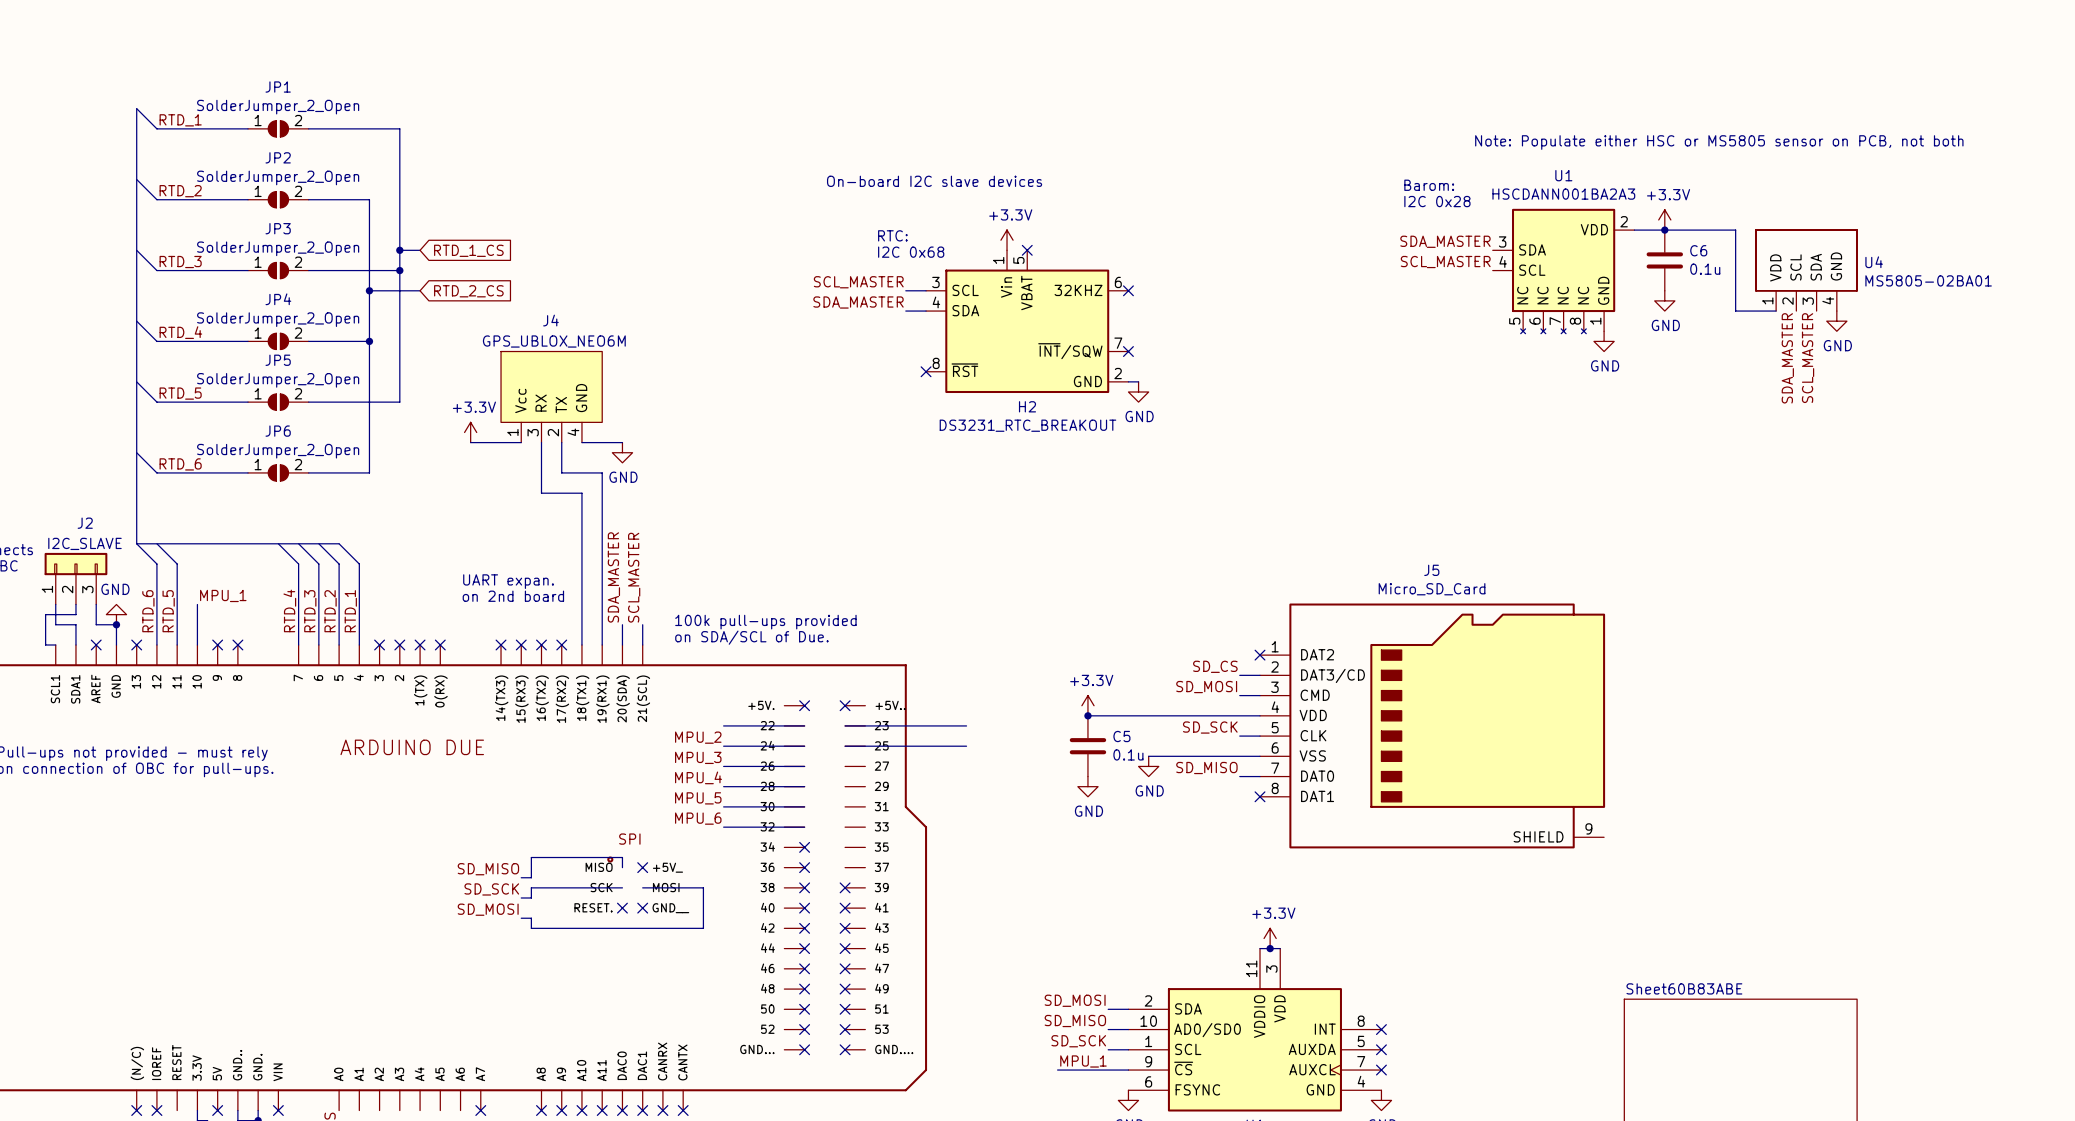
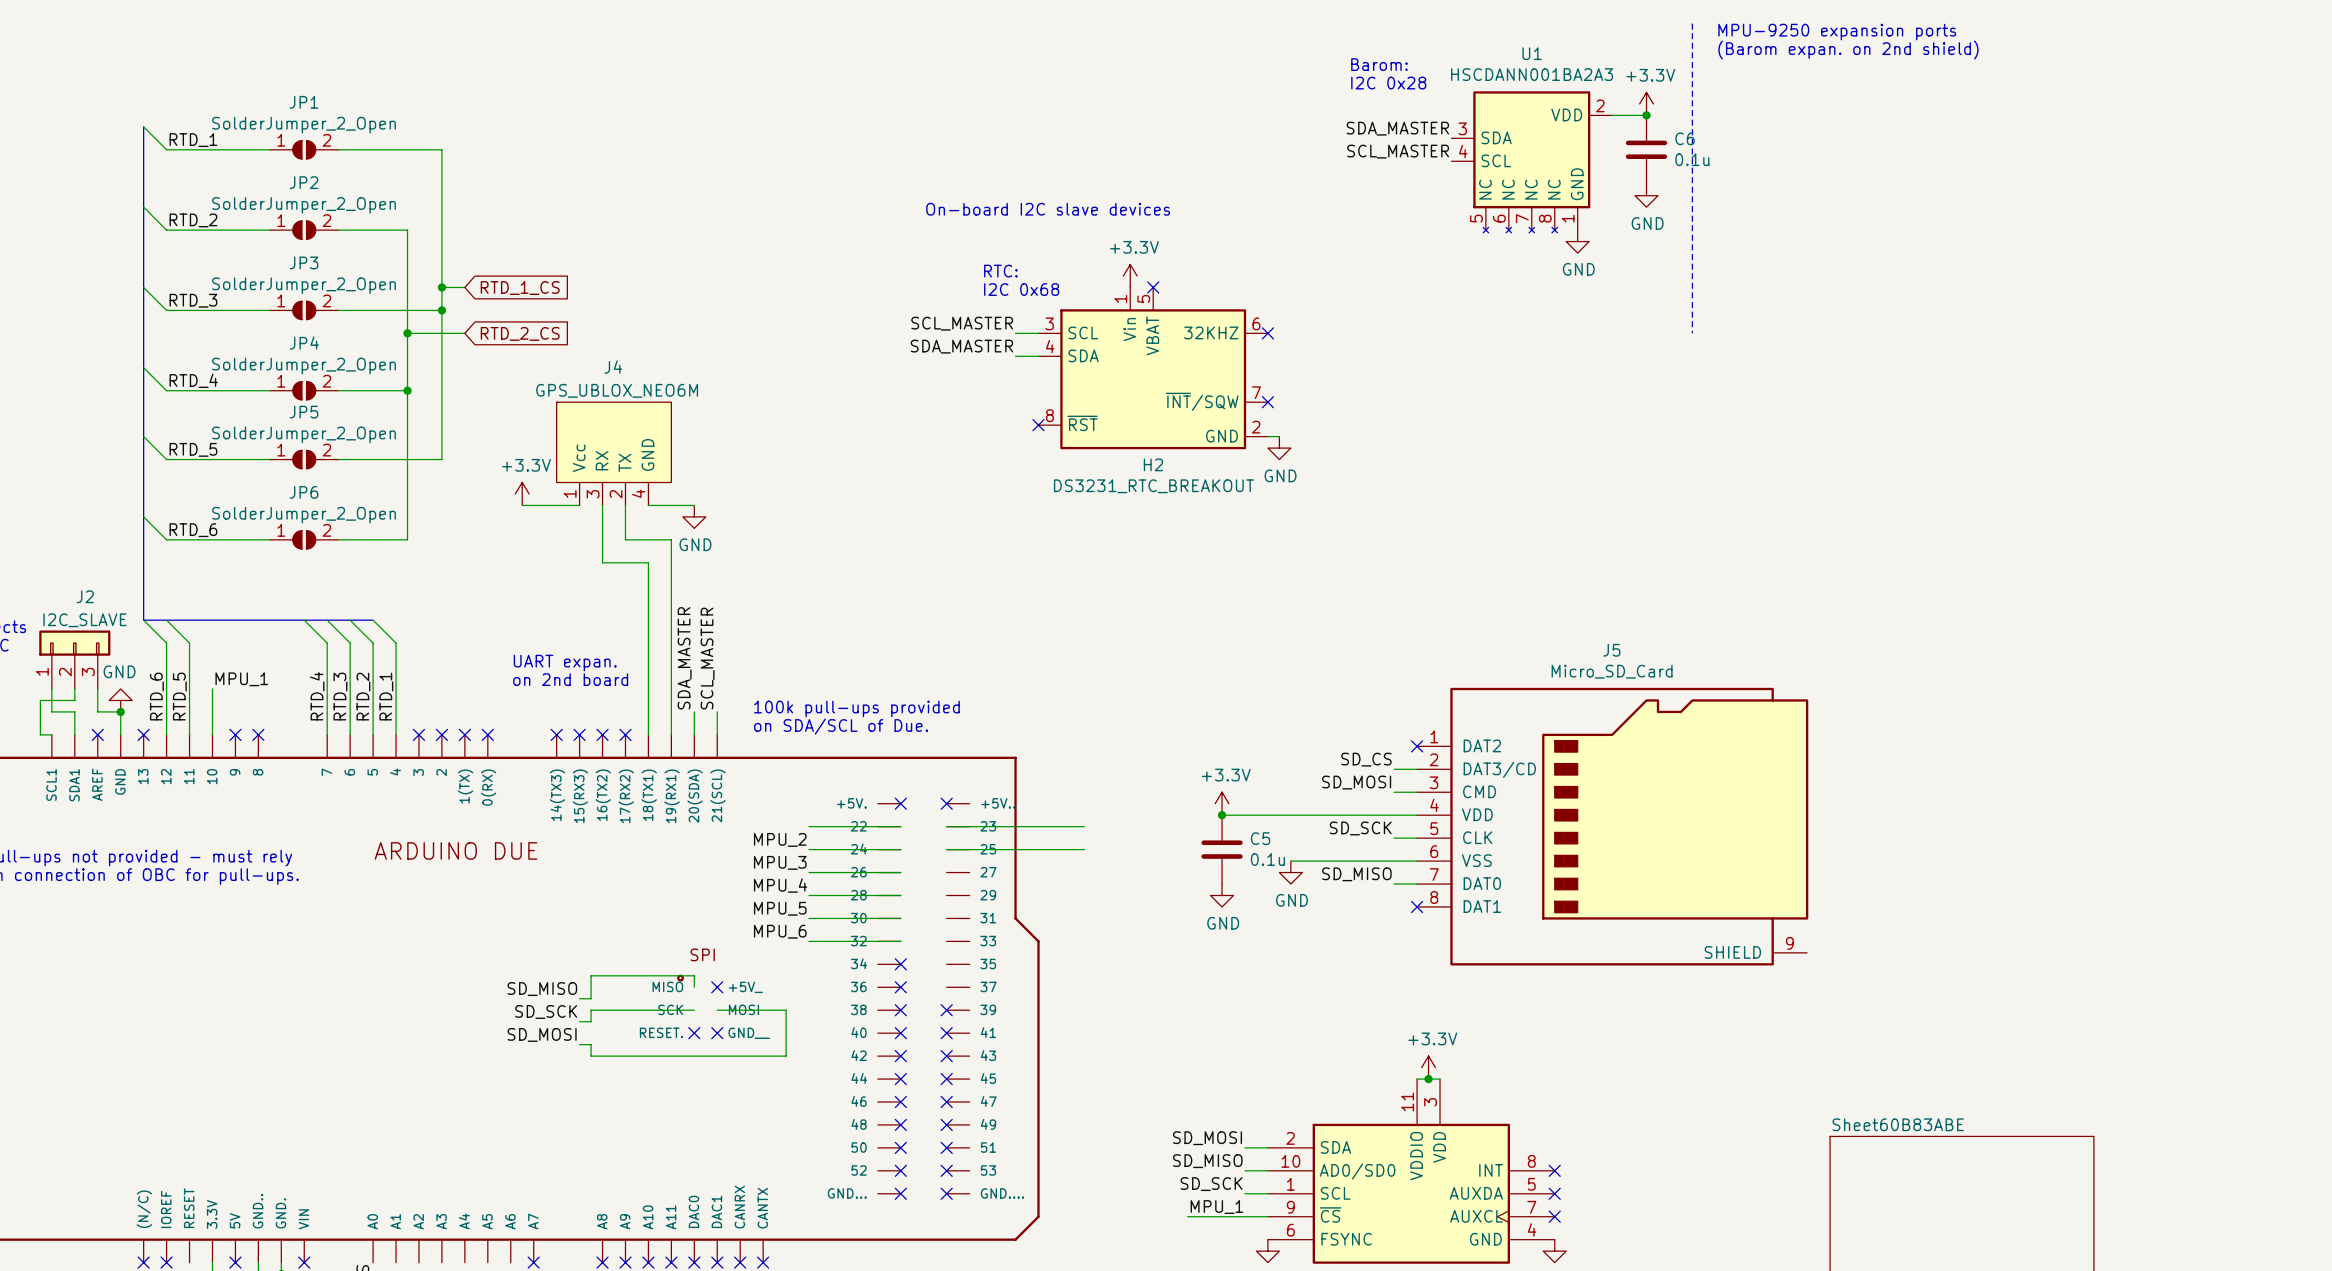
line: none -> (1692, 23) (1692, 333)
text: none -> MPU-9250 expansion ports (1837, 32)
text: none -> (Barom expan. on 2nd shield) (1848, 50)
text: none -> Barom: (1379, 64)
text: none -> I2C 0x28 (1388, 83)
power symbol: none -> +3.3V (1646, 103)
wire: none -> (1612, 115) (1646, 115)
junction: none -> (1646, 115)
label: none -> SDA_MASTER (1397, 128)
label: none -> SCL_MASTER (1398, 151)
text: Note: Populate either HSC or MS5805 sensor on PCB, not both (1719, 142) -> none
power symbol: none -> GND (1646, 195)
text: Barom: (1429, 185) -> none
text: I2C 0x28 (1437, 201) -> none
power symbol: none -> GND (1577, 241)
power symbol: +3.3V (1664, 219) -> none
wire: (1634, 230) (1735, 230) (1735, 311) (1776, 311) -> none
junction: (1664, 230) -> none
label: SDA_MASTER (1445, 241) -> none
C6 position: (1664, 260) -> (1646, 149)
label: SCL_MASTER (1445, 262) -> none
U4: MS5805-02BA01 (1806, 270) -> none
U1 position: (1563, 271) -> (1531, 162)
power symbol: GND (1664, 300) -> none
power symbol: GND (1836, 321) -> none
power symbol: GND (1604, 341) -> none
label: SDA_MASTER (1787, 358) -> none
label: SCL_MASTER (1808, 358) -> none

